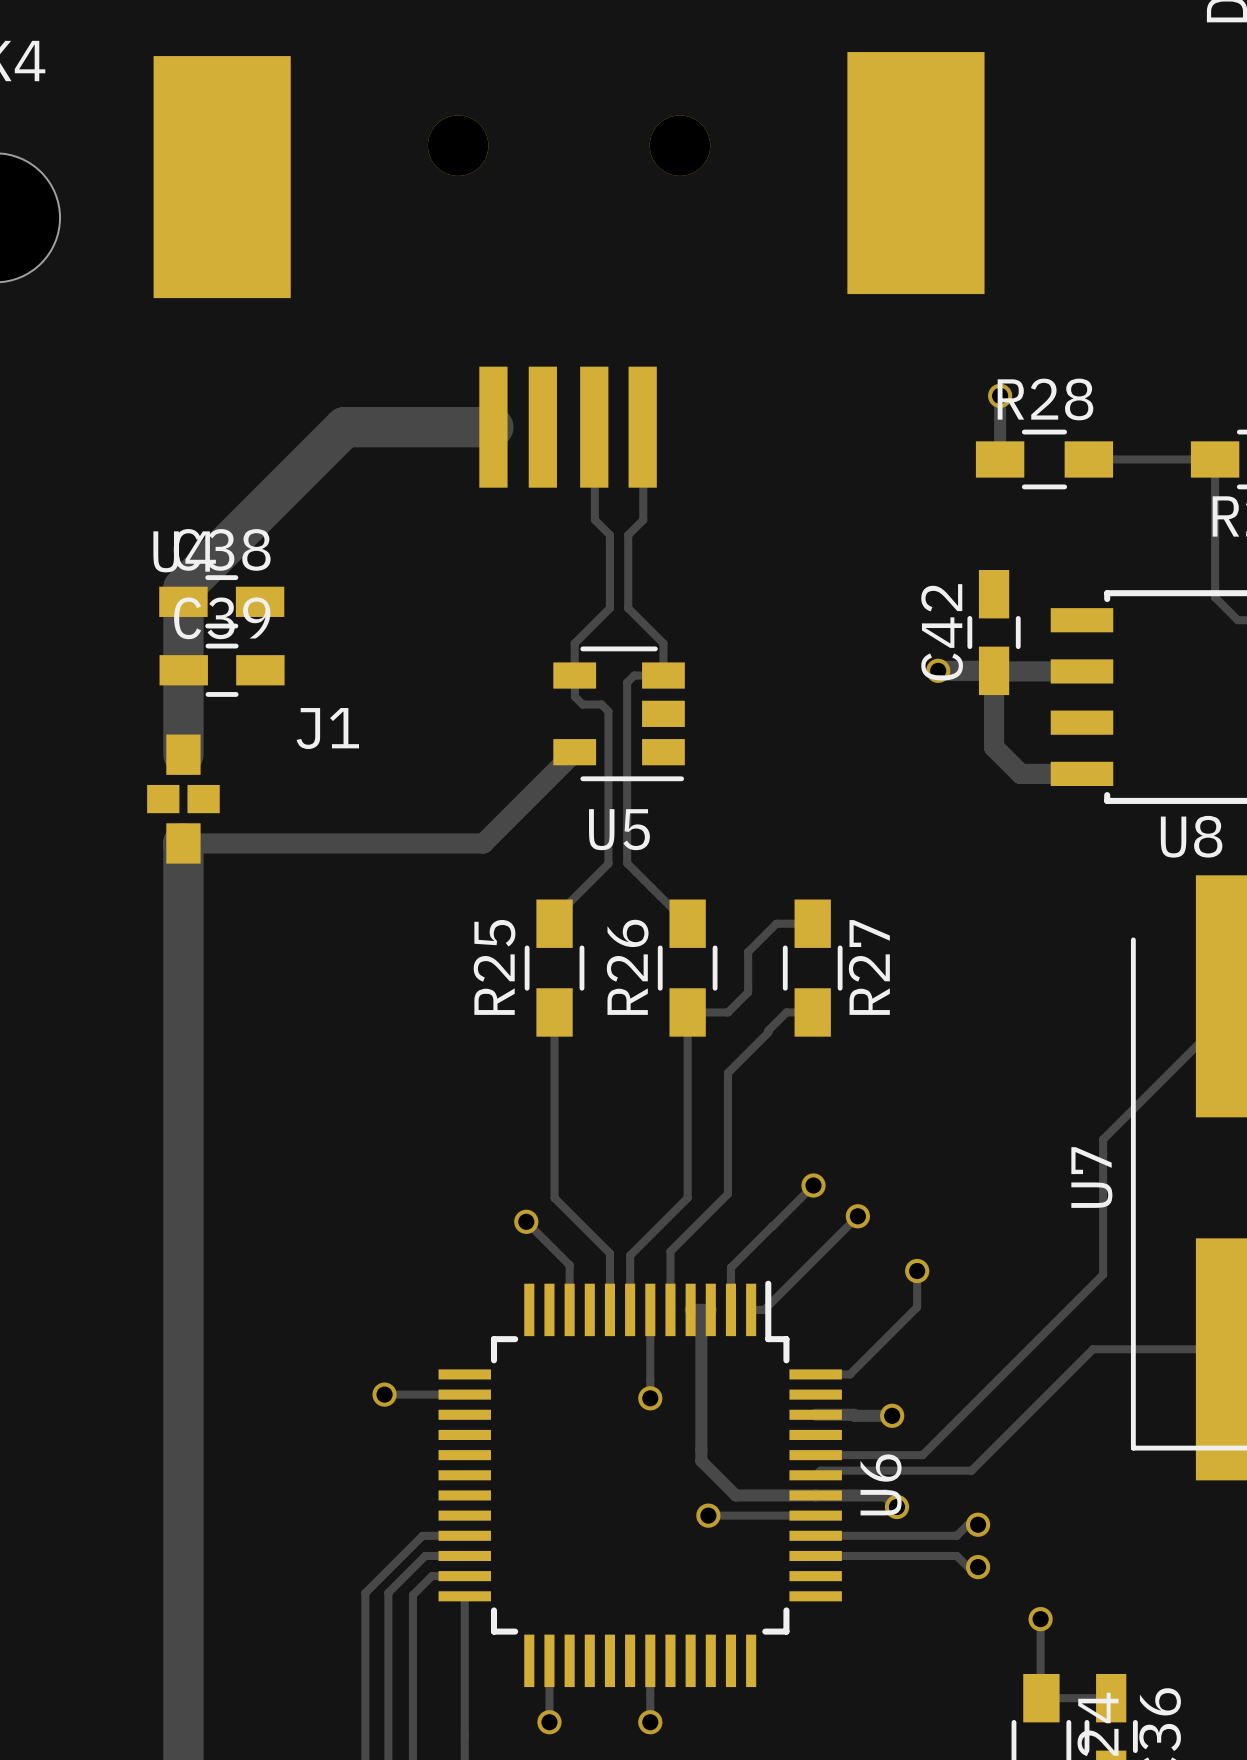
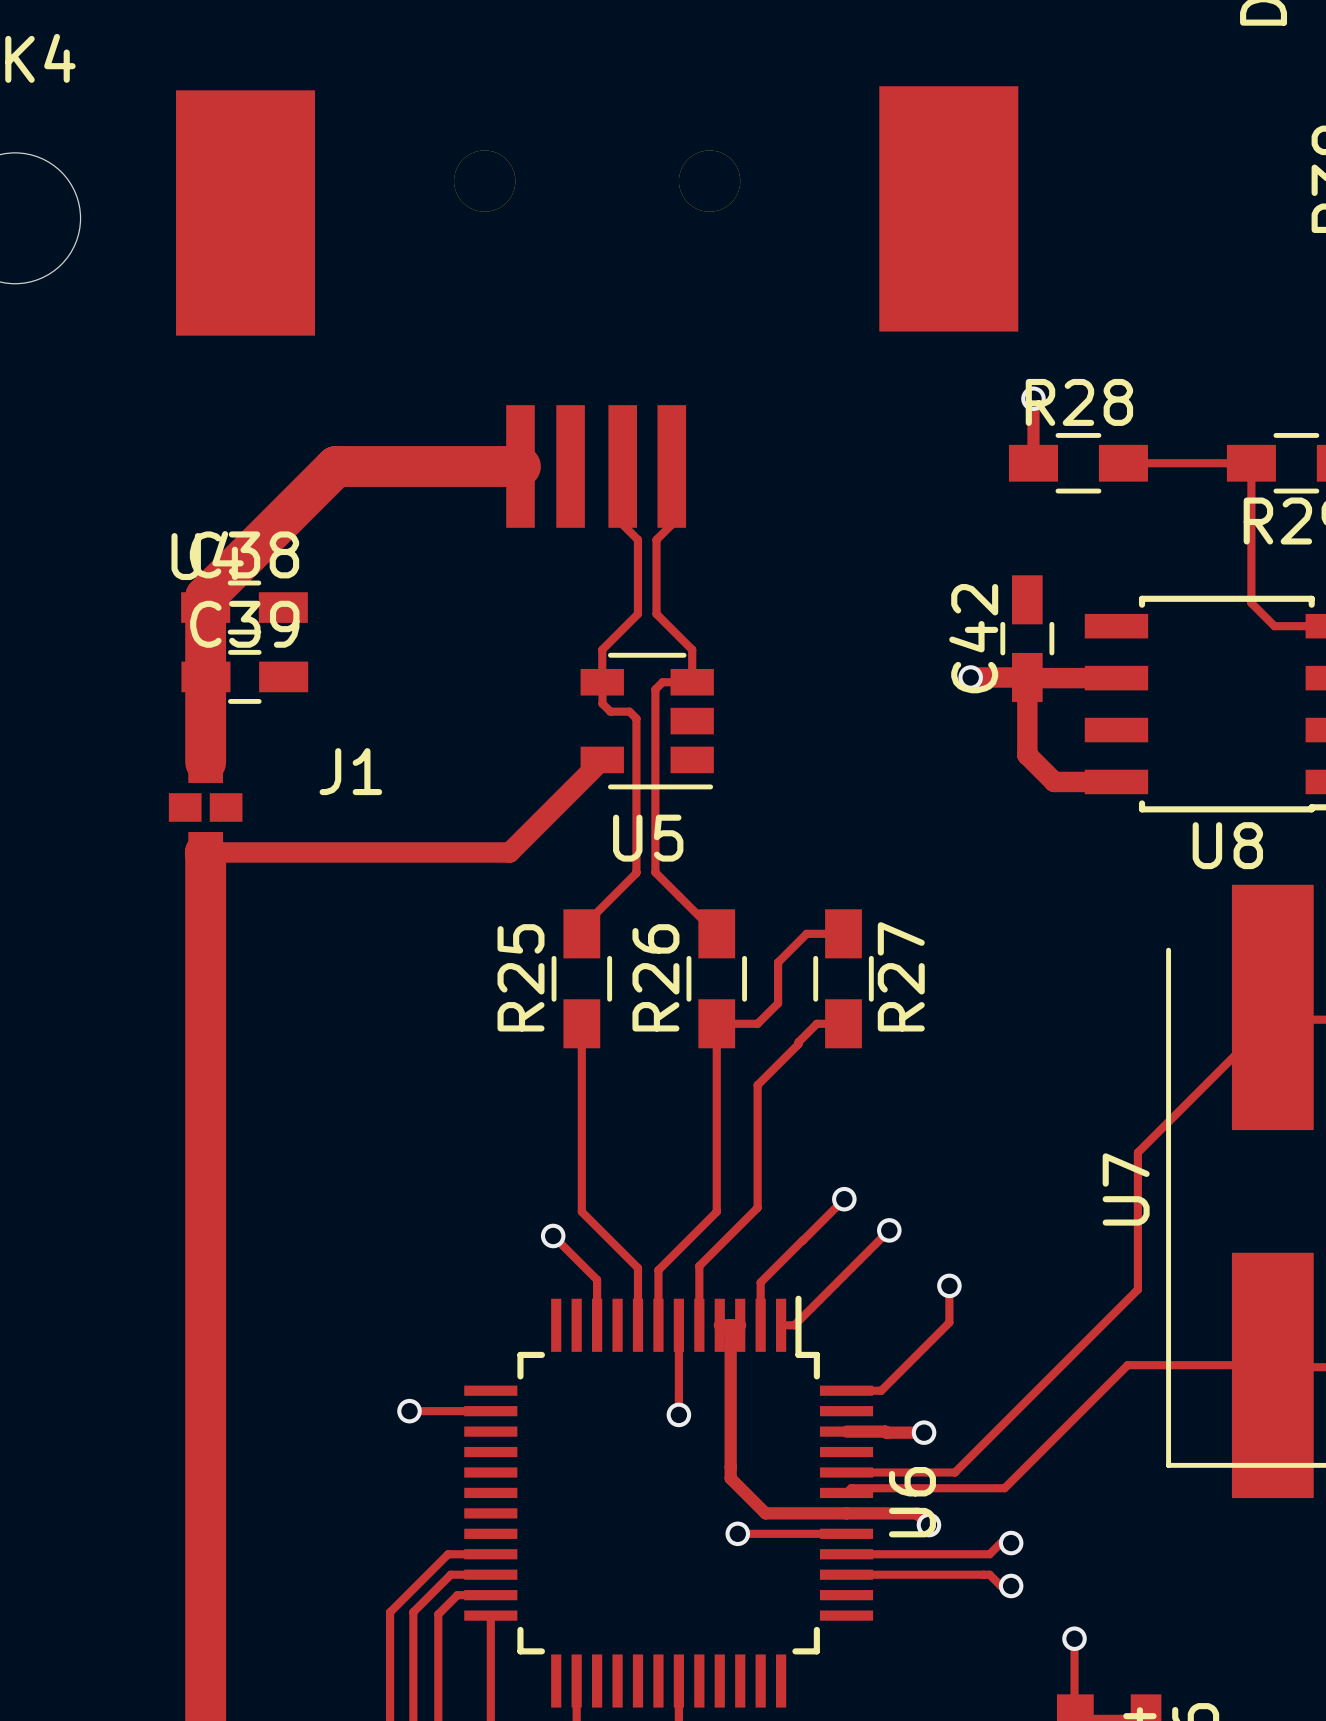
J1 position: (569, 269) -> (597, 307)
track: (493, 427) (344, 427) (183, 588) (183, 591) -> (520, 466) (335, 466) (205, 596)

